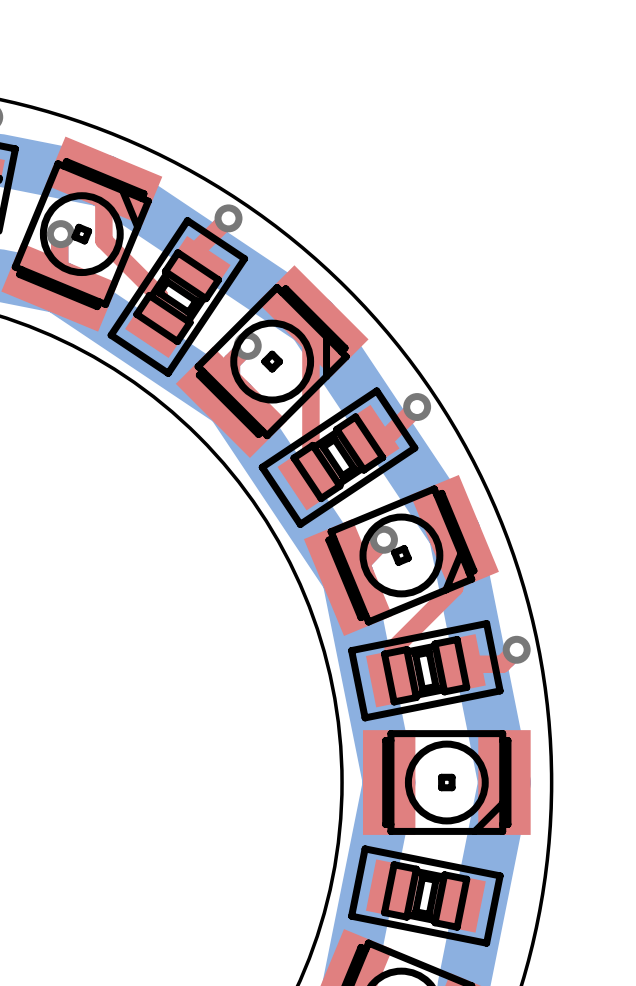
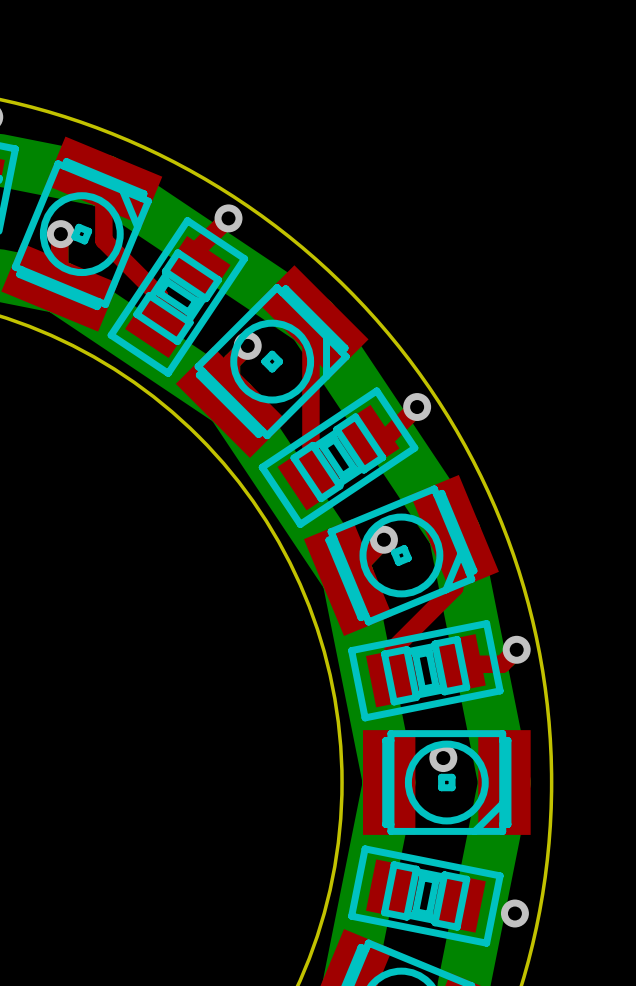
via: none -> (443, 758)
via: none -> (514, 913)

